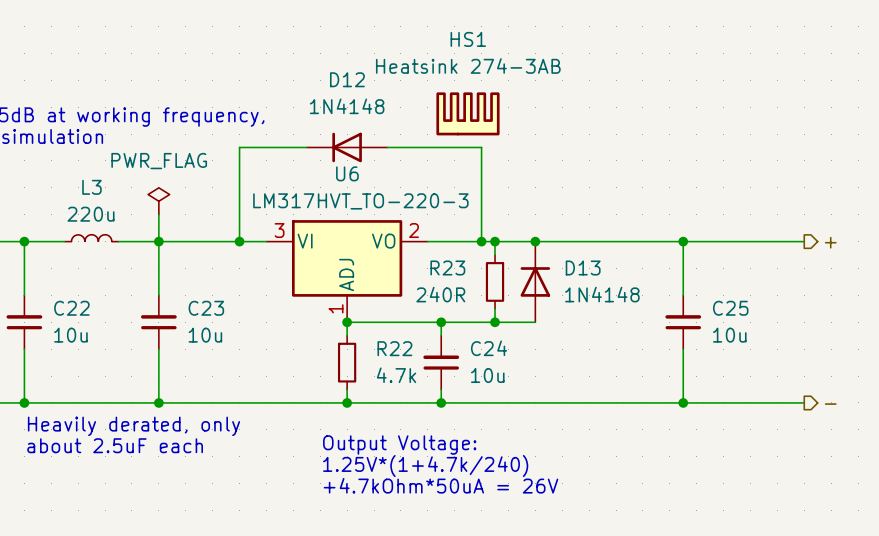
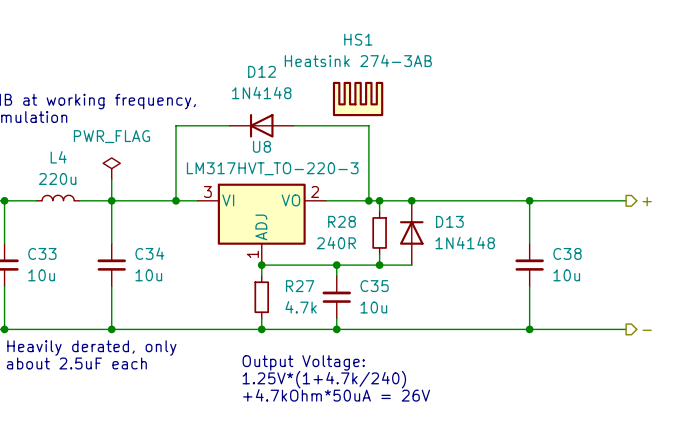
U6 name: U6 (347, 173) -> U8 (261, 146)
L3 name: L3 (91, 187) -> L4 (58, 157)
R23 name: R23 (447, 268) -> R28 (342, 221)
C22 name: C22 (71, 308) -> C33 (42, 253)
C23 name: C23 (206, 308) -> C34 (149, 253)
C25 name: C25 (730, 308) -> C38 (567, 253)
R22 name: R22 (394, 348) -> R27 (300, 286)
C24 name: C24 (489, 348) -> C35 (374, 286)

